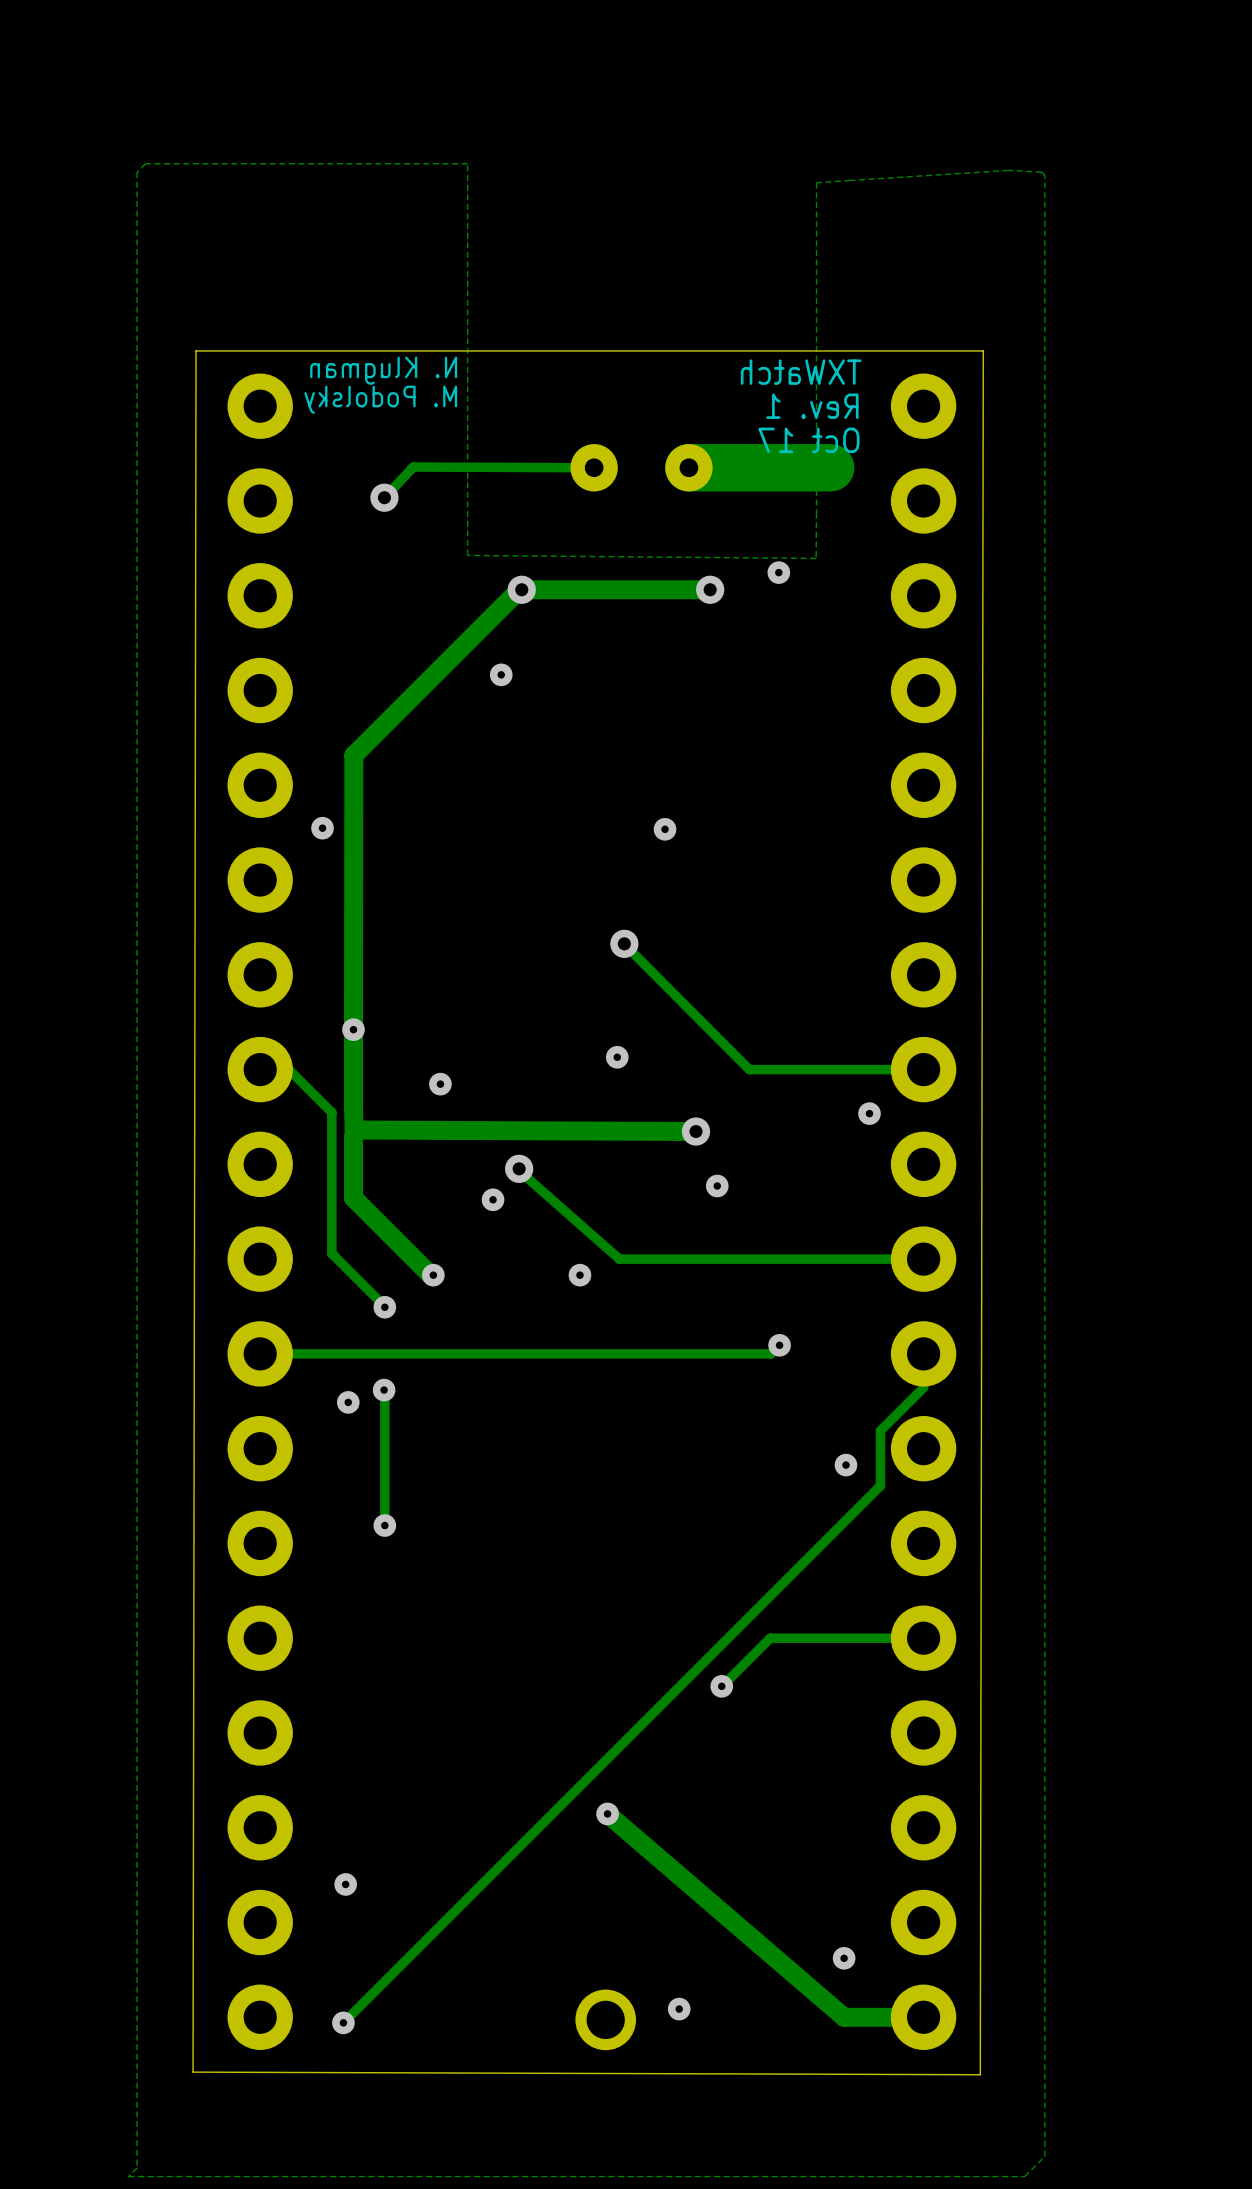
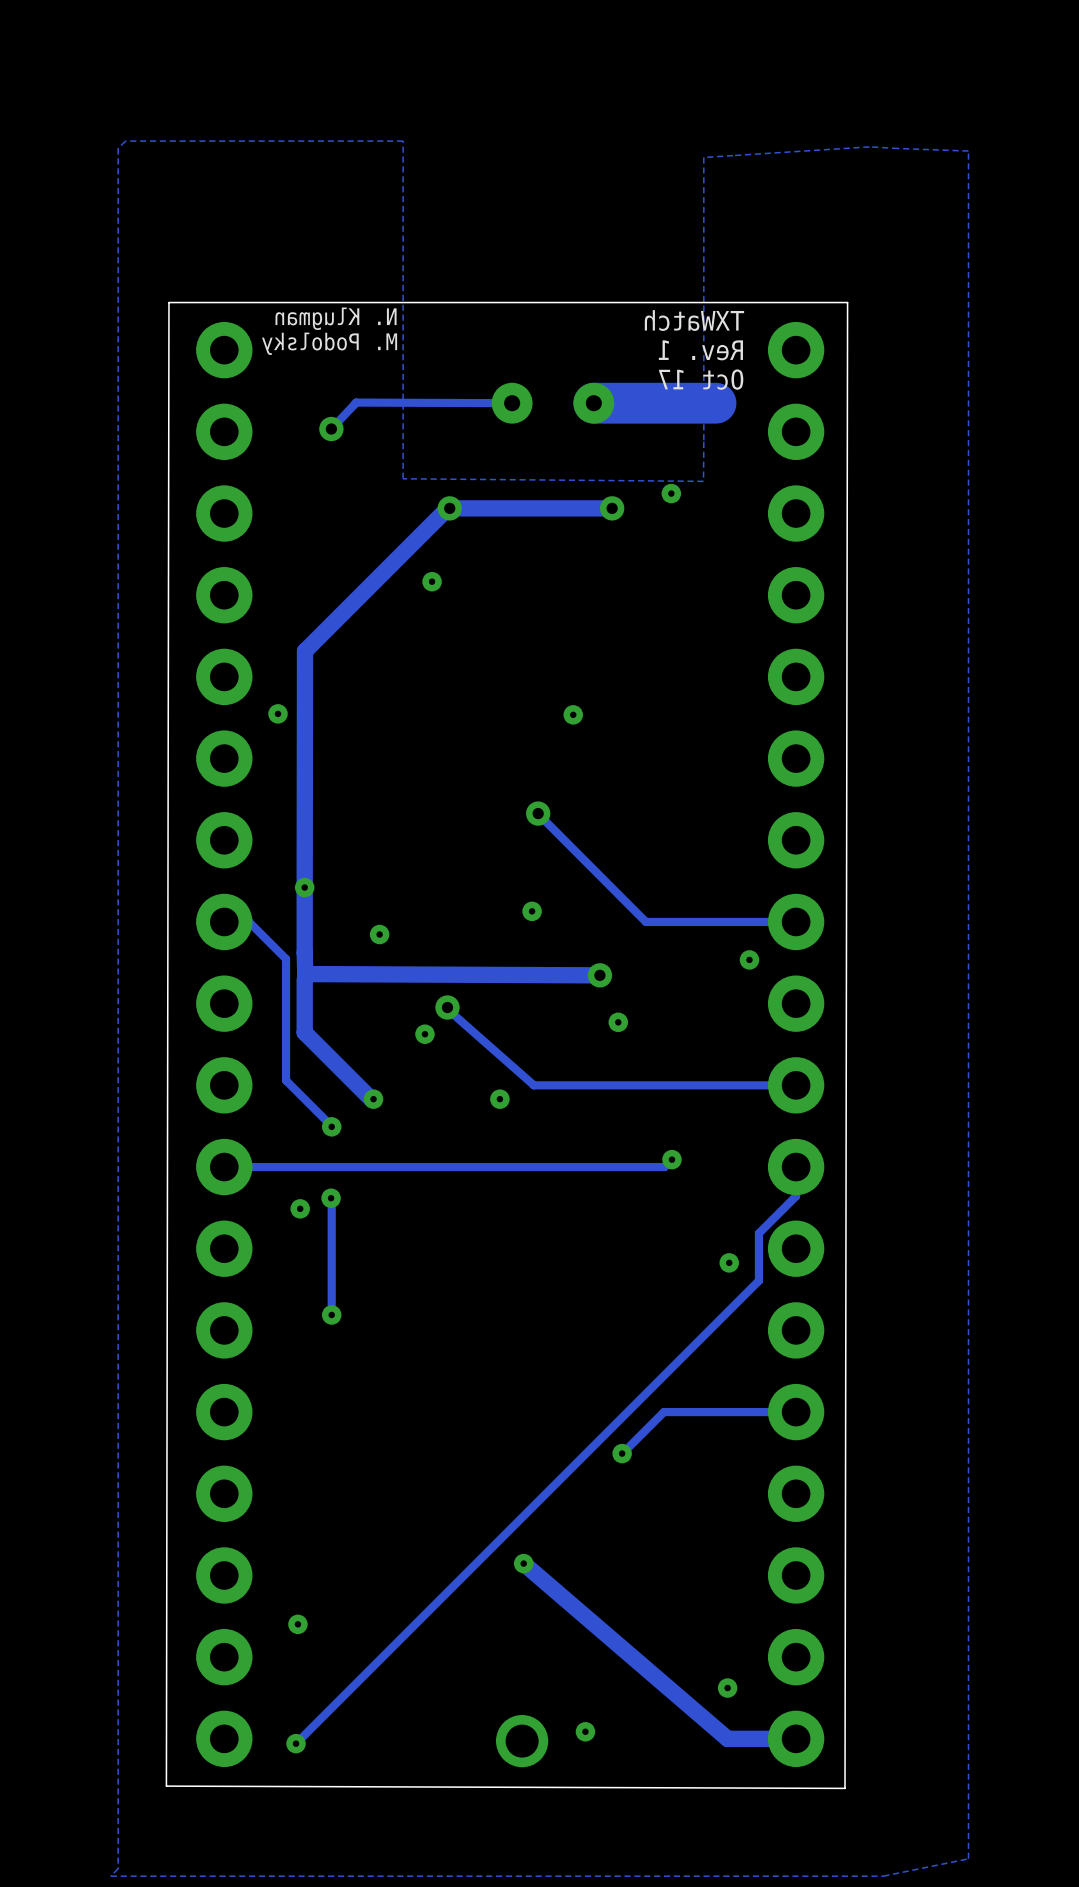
zone outline: (1041, 172) (1044, 175) (1044, 2156) (1024, 2176) -> (898, 148) (968, 151) (968, 1858) (883, 1876)

